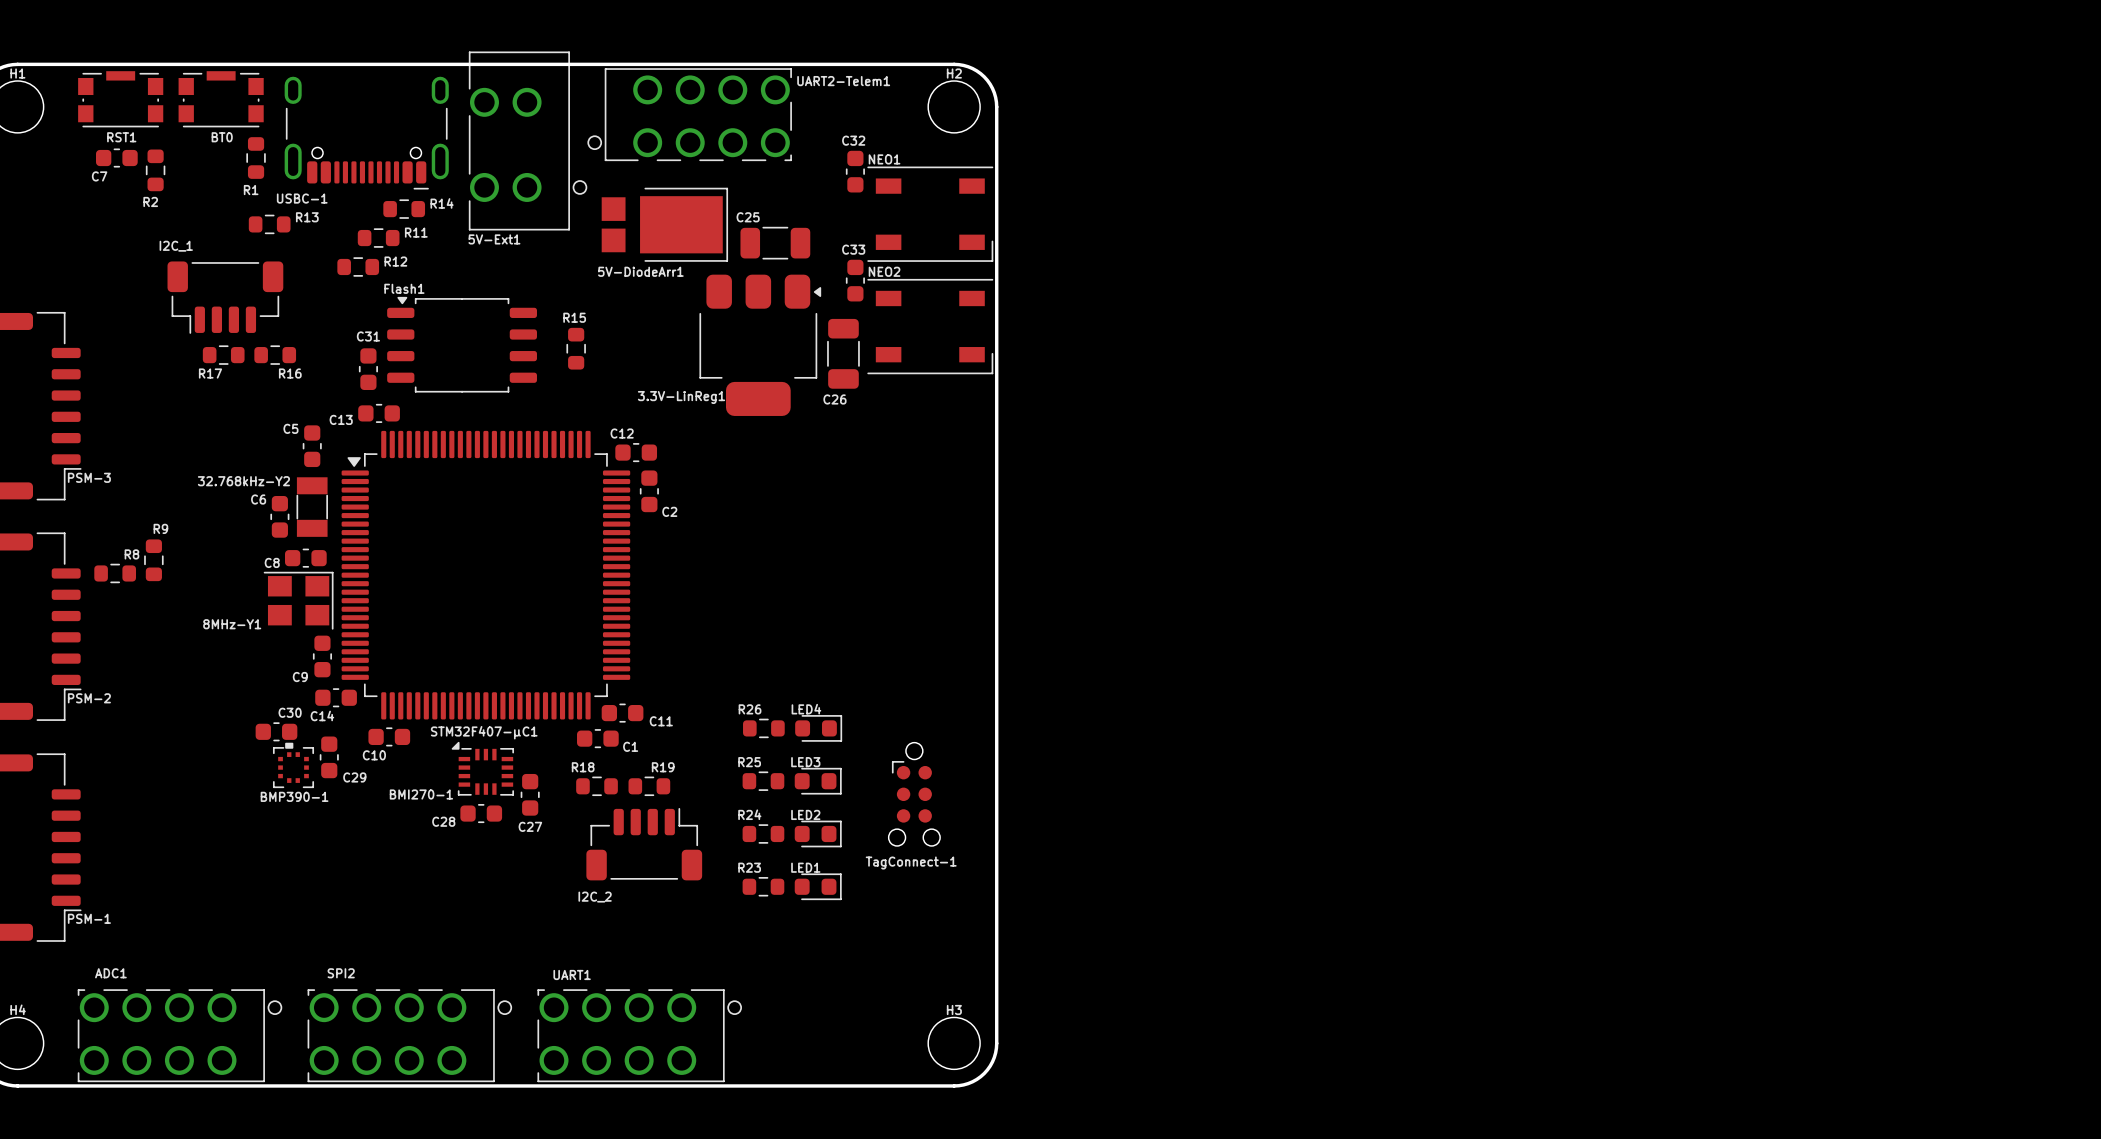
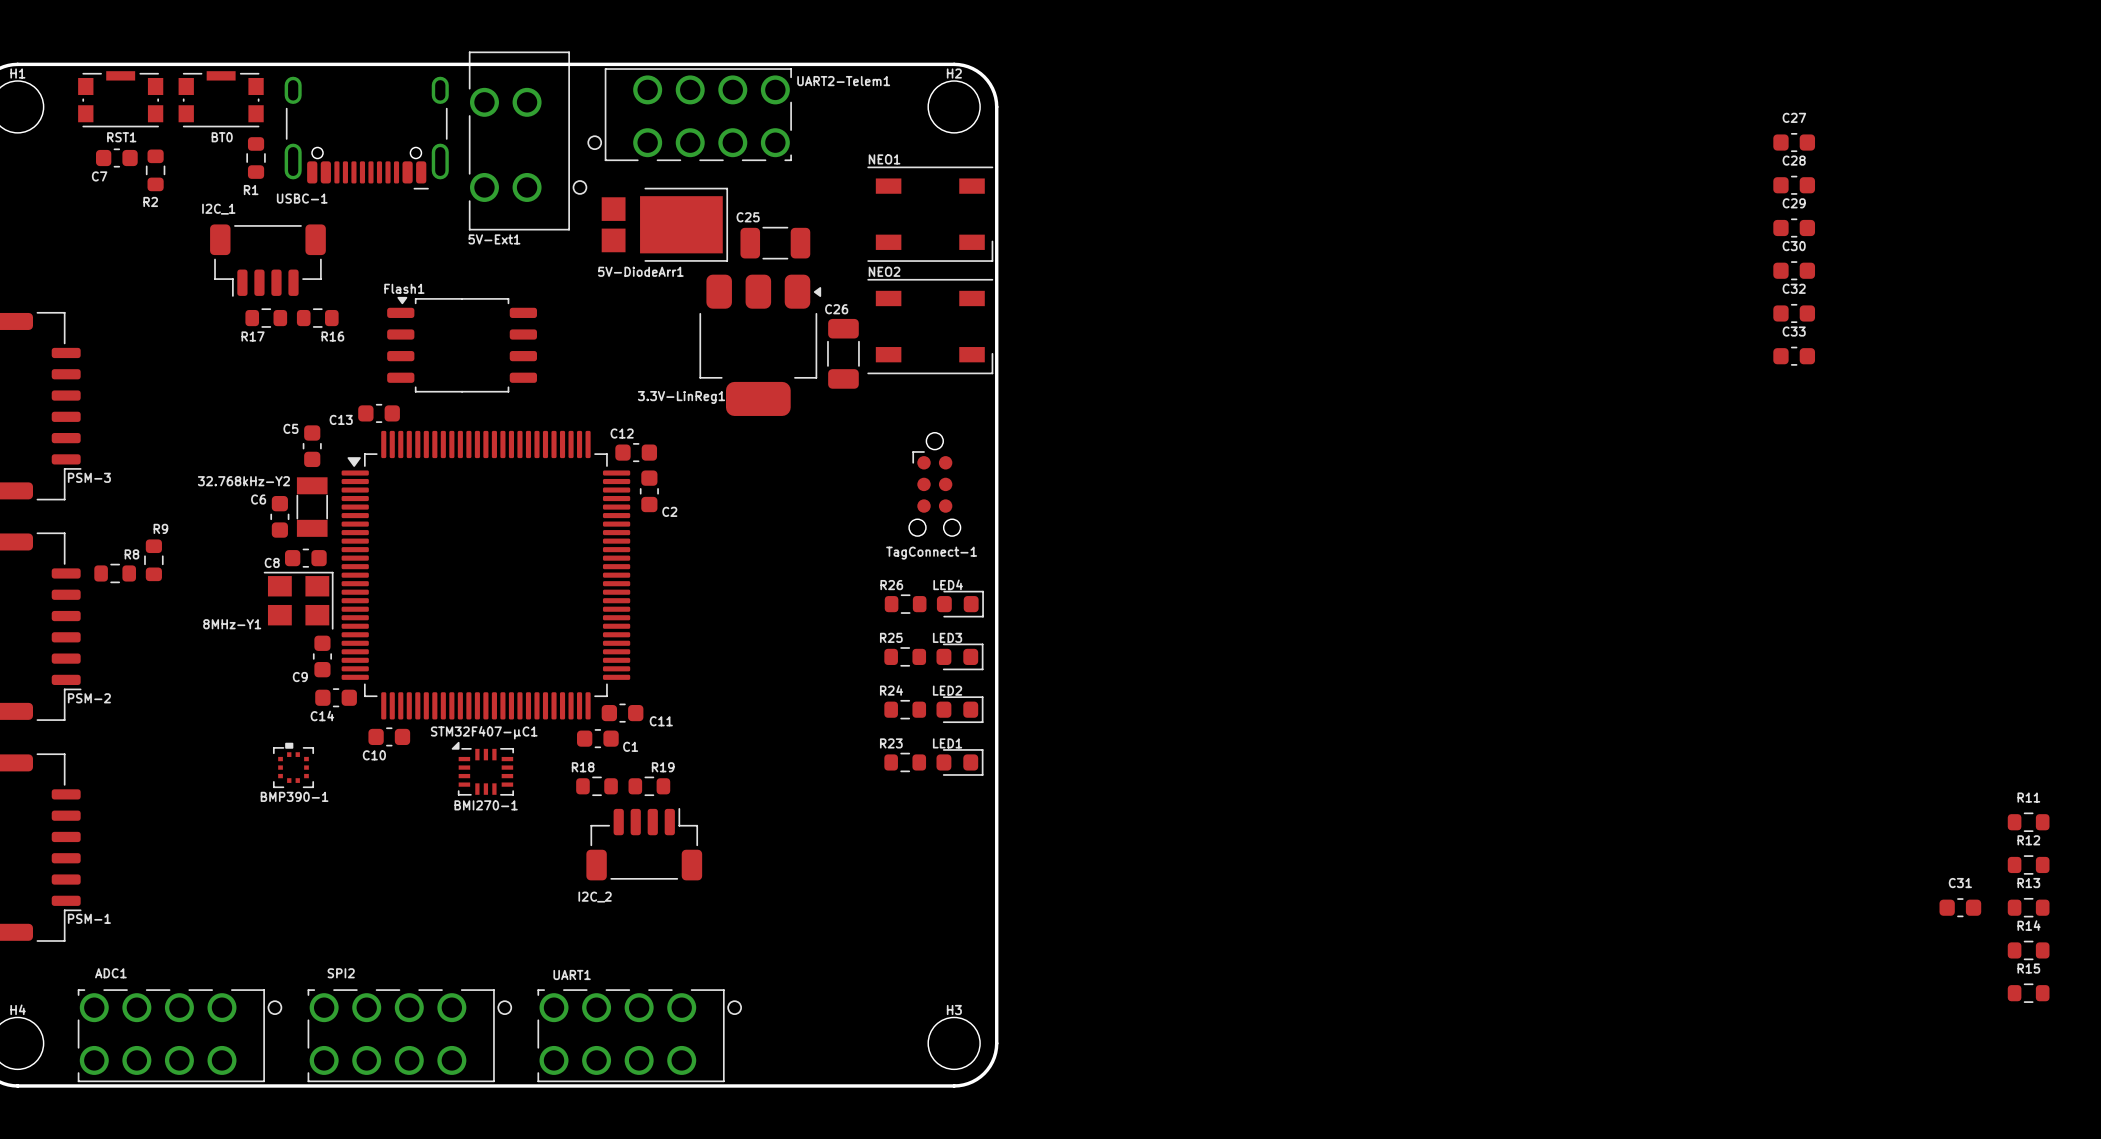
C32 rotation: 0° (855, 171) -> 90° clockwise (1794, 313)
C32 position: (855, 171) -> (1794, 313)
R14 name position: R14 (442, 203) -> R14 (2029, 925)
R14 position: (404, 209) -> (2028, 950)
R13 name position: R13 (307, 217) -> R13 (2028, 883)
R13 position: (269, 224) -> (2028, 907)
R11 name position: R11 (416, 232) -> R11 (2028, 797)
R11 position: (378, 238) -> (2028, 822)
R12 name position: R12 (395, 261) -> R12 (2028, 840)
R12 position: (358, 266) -> (2028, 864)
C33 rotation: 0° (855, 280) -> 90° clockwise (1794, 356)
C33 position: (855, 280) -> (1794, 356)
I2C_1 position: (225, 297) -> (267, 260)
R15 rotation: 0° (576, 348) -> 90° clockwise (2028, 993)
R15 position: (576, 348) -> (2028, 993)
R17 position: (223, 355) -> (266, 318)
R16 position: (275, 355) -> (317, 318)
C31 rotation: 0° (368, 369) -> 90° clockwise (1960, 907)
C31 position: (368, 369) -> (1960, 907)
C26 name position: C26 (834, 399) -> C26 (836, 309)
C30 name position: C30 (290, 712) -> C30 (1794, 246)
R26 position: (763, 728) -> (905, 604)
LED4 position: (818, 728) -> (960, 604)
C30 position: (276, 731) -> (1794, 270)
C29 rotation: 0° (329, 757) -> 90° clockwise (1794, 227)
C29 position: (329, 757) -> (1794, 227)
C29 name position: C29 (354, 777) -> C29 (1794, 203)
R25 position: (763, 781) -> (905, 656)
LED3 position: (818, 781) -> (959, 656)
BMI270-1 name position: BMI270-1 (421, 794) -> BMI270-1 (486, 805)
C27 rotation: 0° (530, 794) -> 90° clockwise (1794, 142)
C27 position: (530, 794) -> (1794, 142)
TagConnect-1 position: (914, 794) -> (934, 484)
C28 position: (481, 813) -> (1794, 185)
C28 name position: C28 (443, 821) -> C28 (1794, 160)
C27 name position: C27 (530, 826) -> C27 (1794, 117)
R24 position: (763, 833) -> (905, 709)
LED2 position: (818, 833) -> (959, 709)
R23 position: (763, 886) -> (905, 762)
LED1 position: (818, 886) -> (959, 762)

